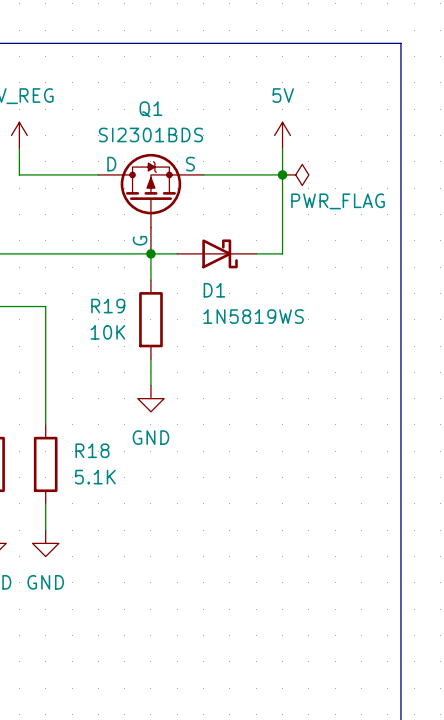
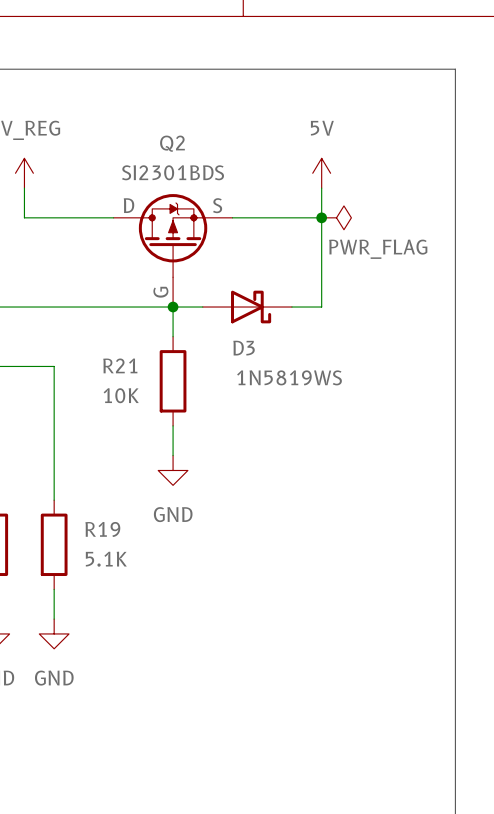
Q1 name: Q1 (150, 109) -> Q2 (172, 143)
D1 name: D1 (214, 290) -> D3 (244, 348)
R19 name: R19 (108, 306) -> R21 (120, 365)
R18 name: R18 (92, 450) -> R19 (102, 529)

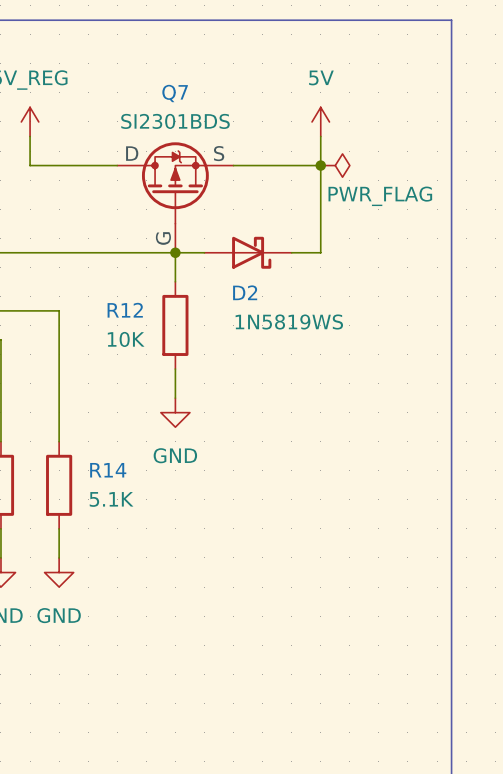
Q2 name: Q2 (172, 143) -> Q7 (175, 93)
D3 name: D3 (244, 348) -> D2 (245, 292)
R21 name: R21 (120, 365) -> R12 (125, 310)
R19 name: R19 (102, 529) -> R14 (108, 470)

